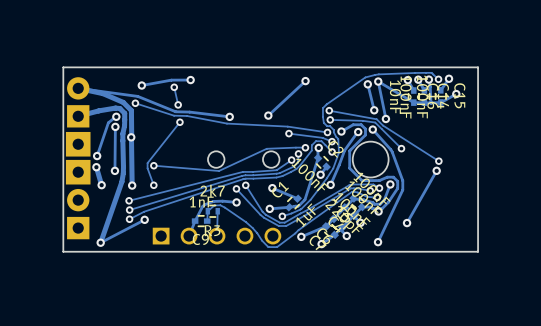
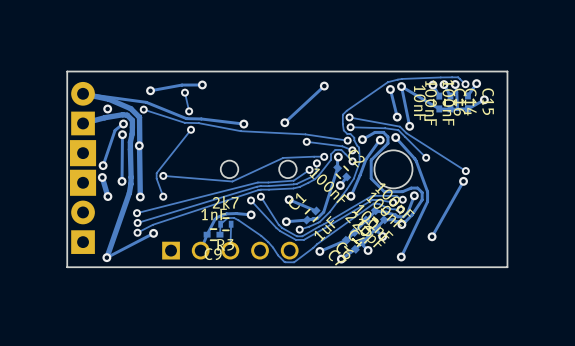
via: none -> (107, 108)

